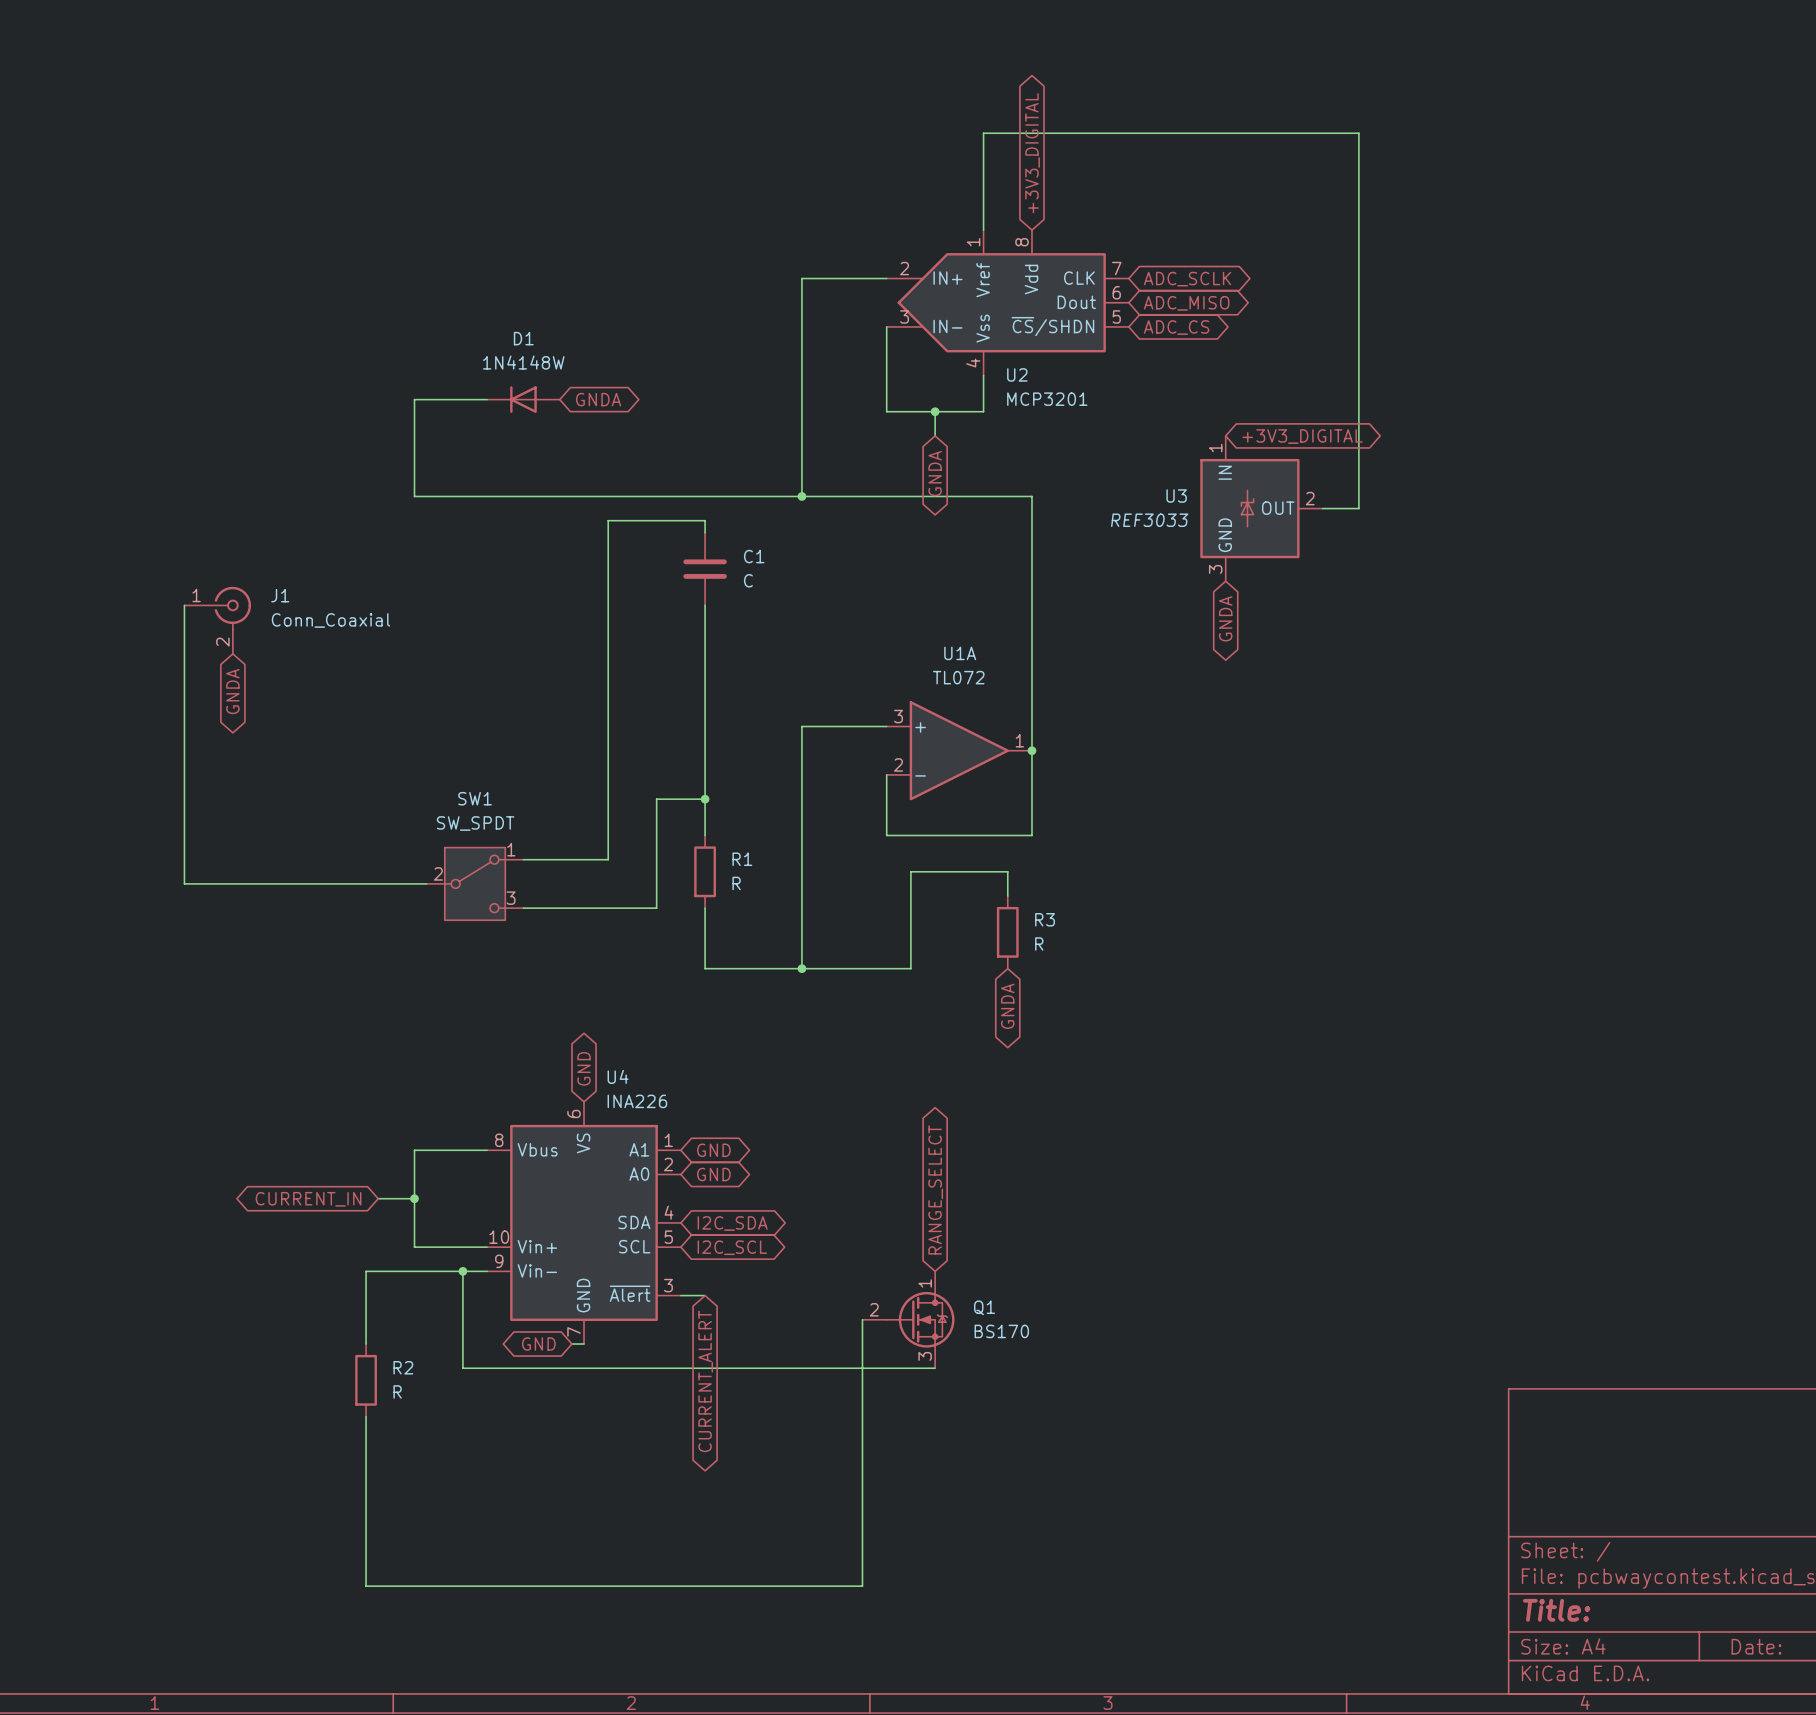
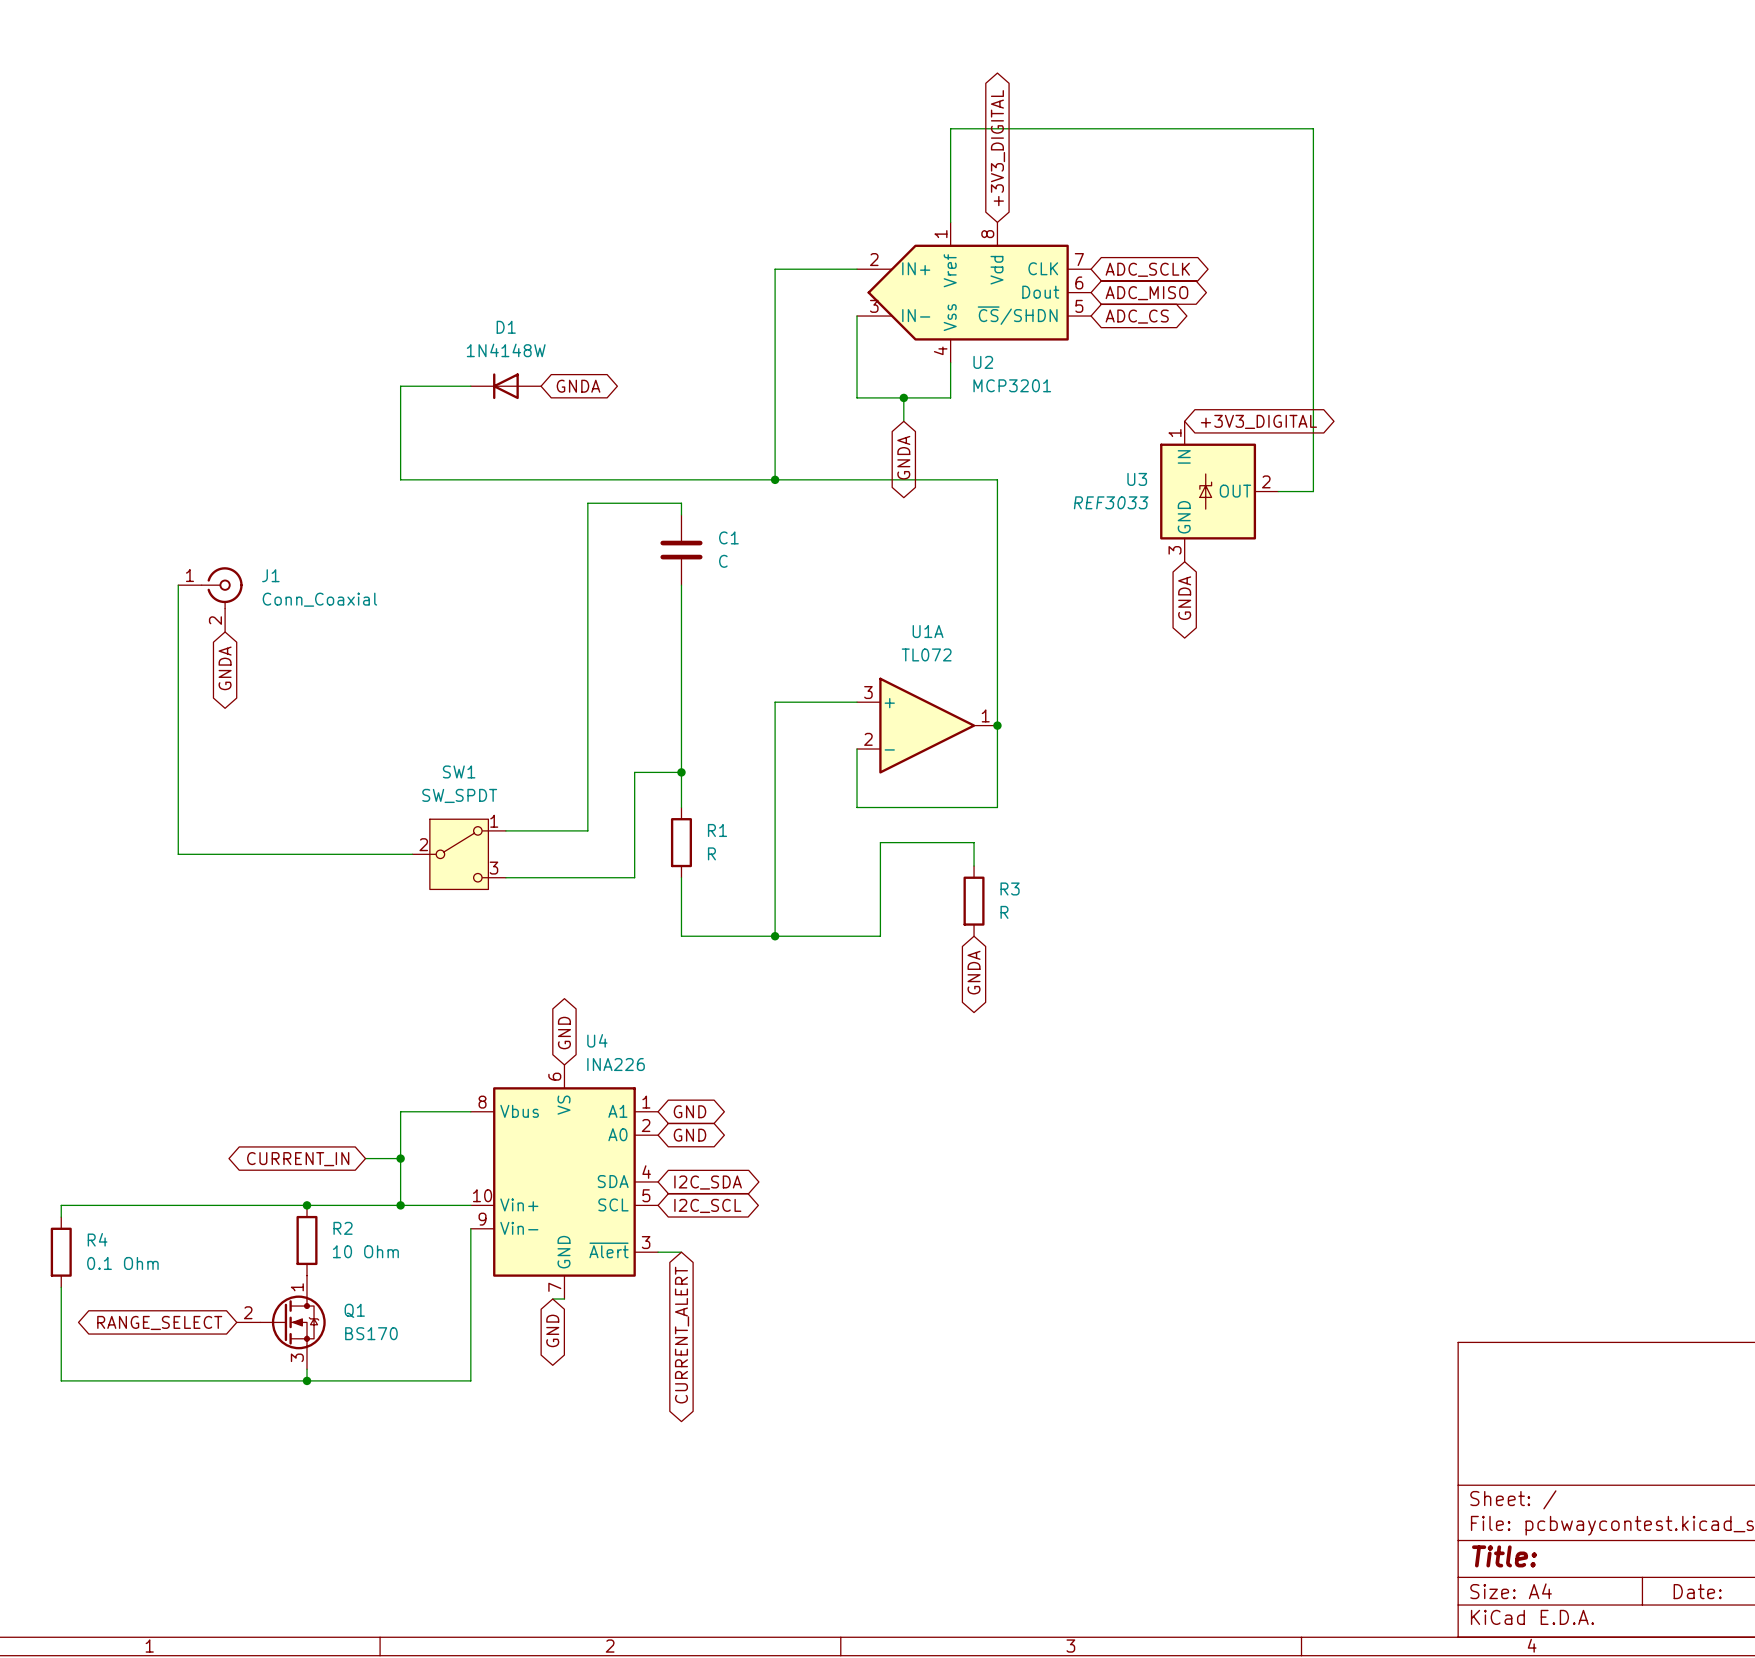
global label: RANGE_SELECT (935, 1189) -> none
junction: none -> (307, 1205)
wire: none -> (400, 1205) (61, 1205) (61, 1217)
wire: (462, 1271) (462, 1368) (935, 1368) -> none
junction position: (462, 1271) -> (400, 1205)
wire: (487, 1271) (366, 1271) (366, 1344) -> (470, 1228) (470, 1380) (61, 1380) (61, 1287)
R4: none -> 0.1 Ohm (61, 1252)
wire: (862, 1319) (862, 1586) (366, 1586) (366, 1416) -> none
Q1 position: (908, 1319) -> (281, 1322)
global label rotation: 0° (538, 1344) -> 90° counterclockwise (552, 1330)
global label: none -> RANGE_SELECT (159, 1322)
R2 position: (366, 1380) -> (307, 1240)
R2 value: R (397, 1391) -> 10 Ohm (365, 1251)
wire: none -> (307, 1369) (307, 1380)
junction: none -> (307, 1380)

